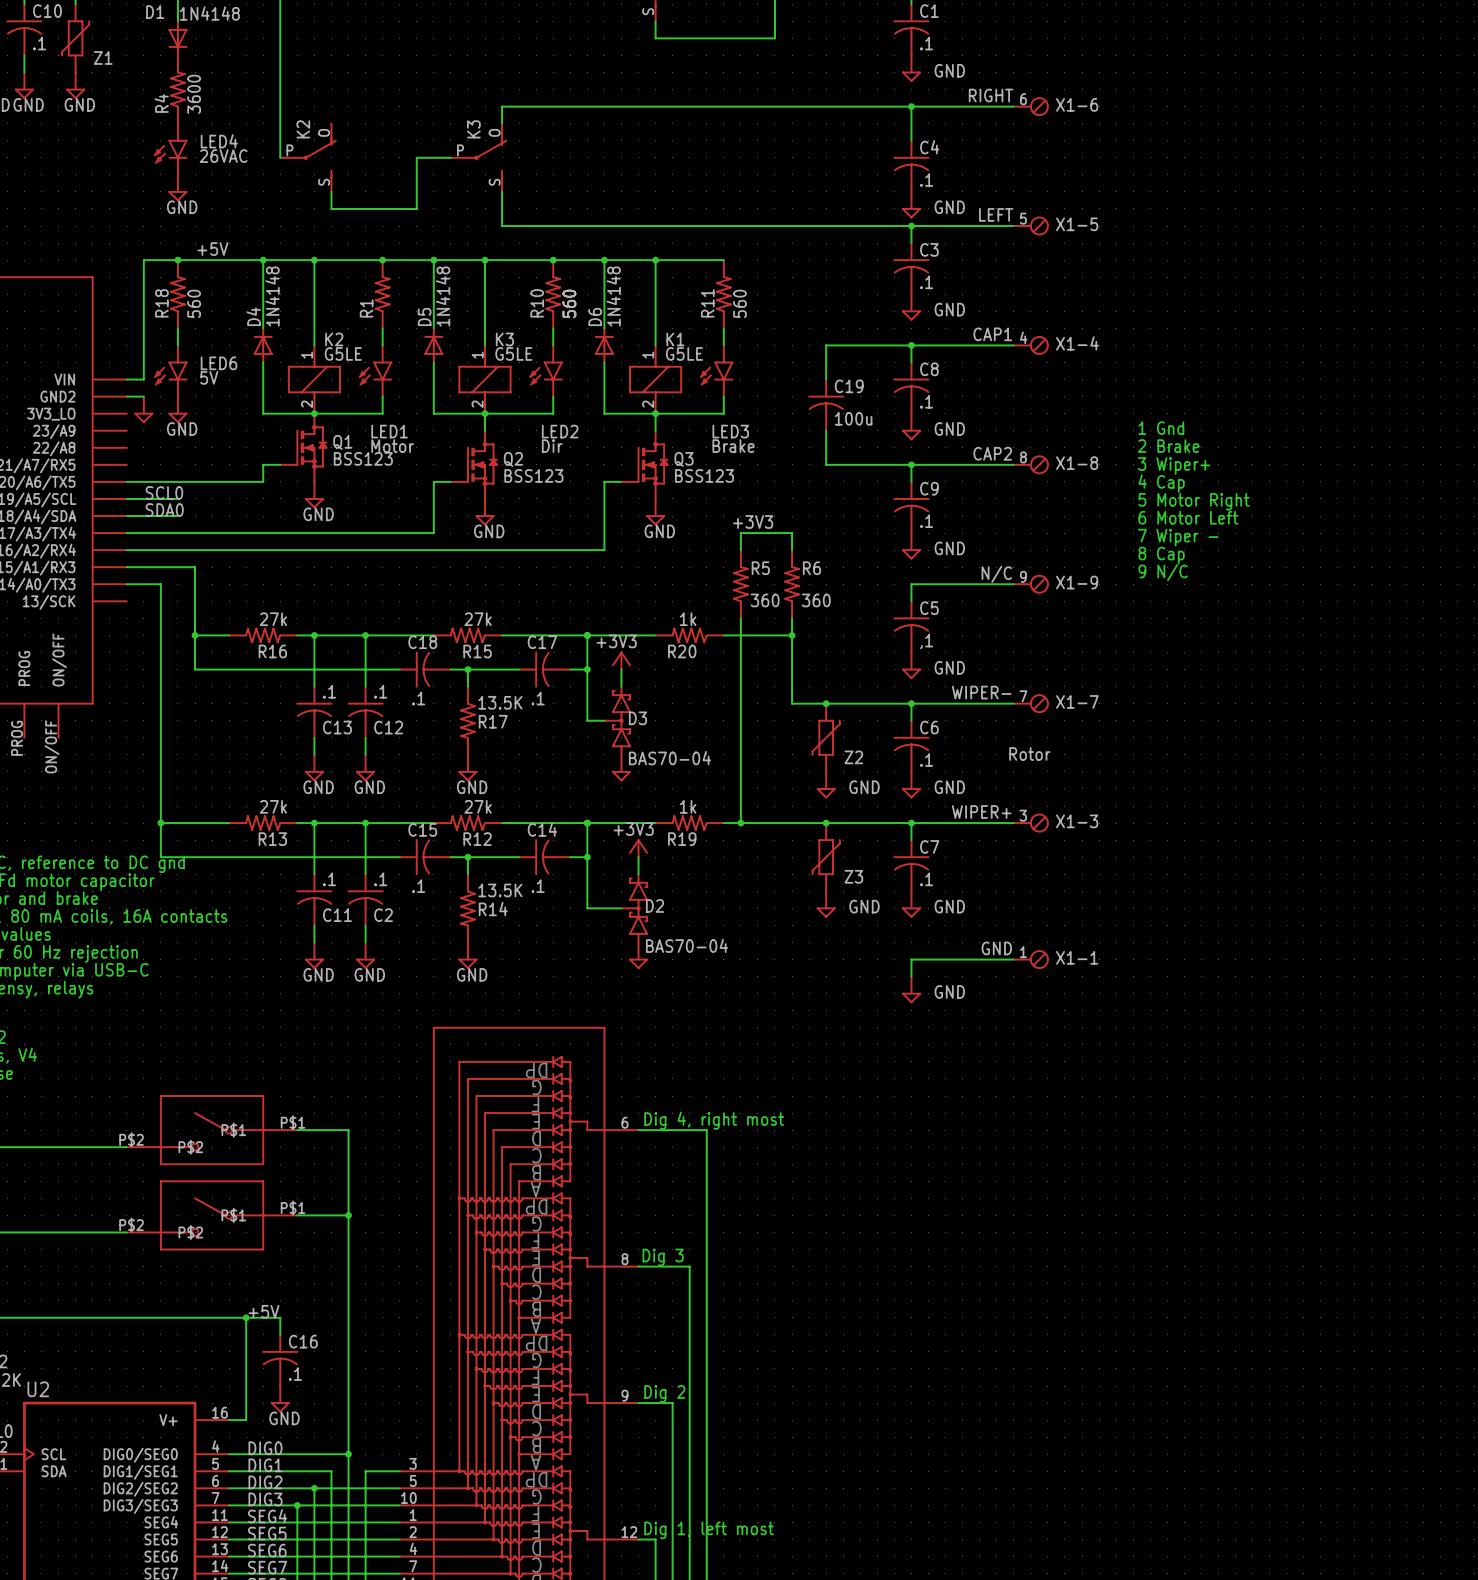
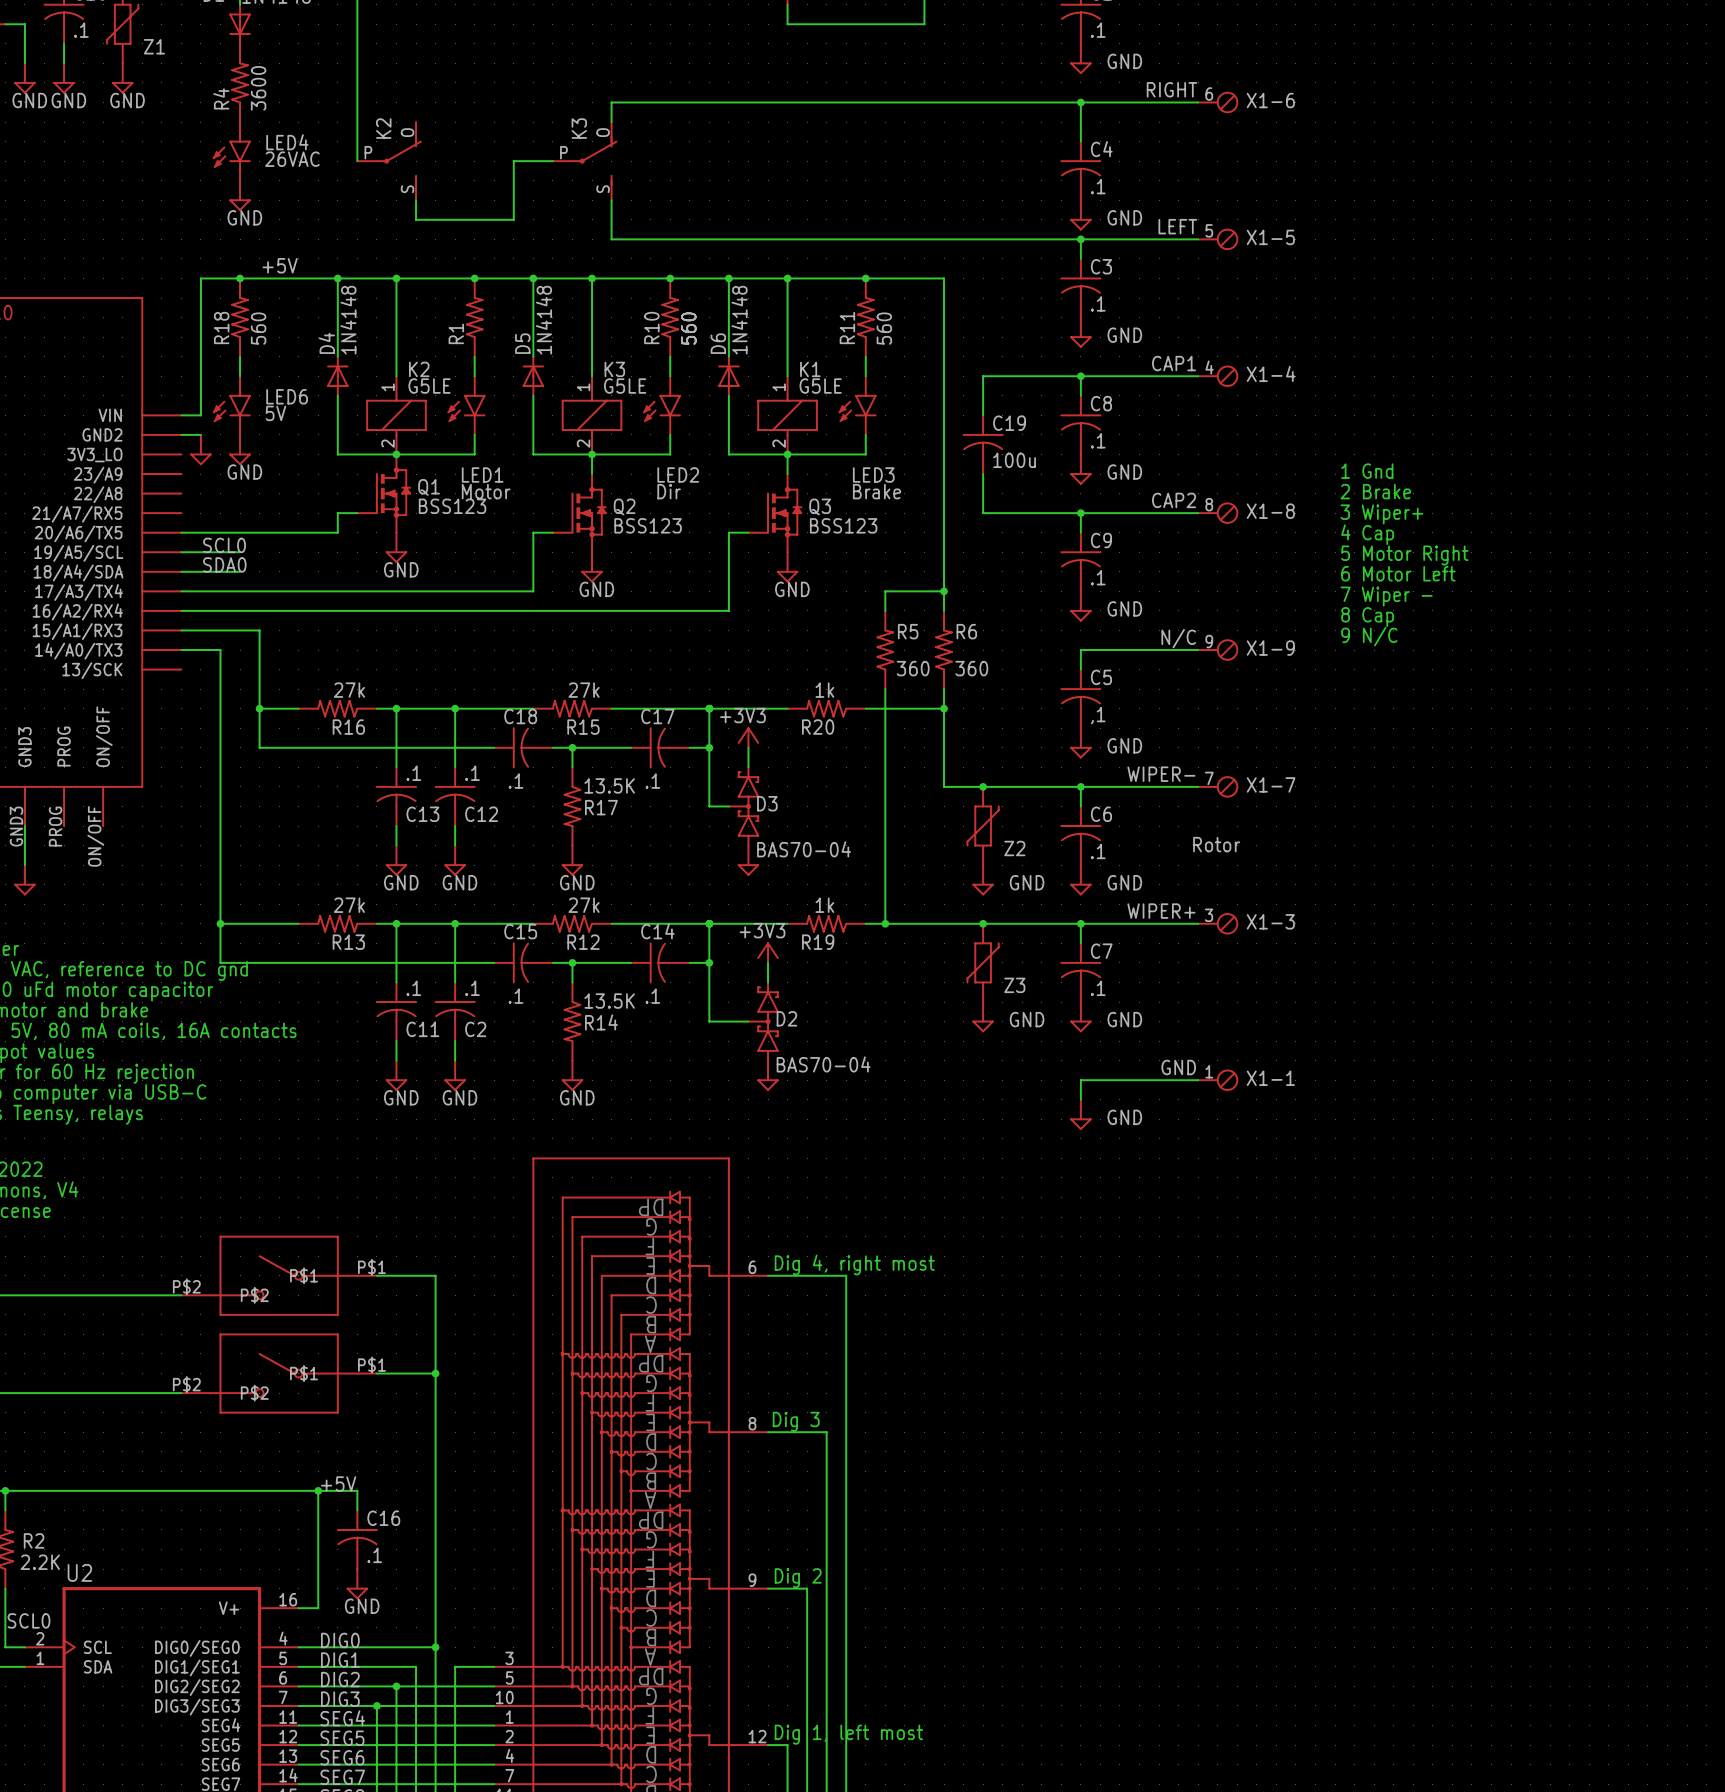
wire: none -> (865, 278) (944, 278) (944, 591)
junction: none -> (865, 278)
label: +3V3 (753, 521) -> none
junction: none -> (944, 591)

